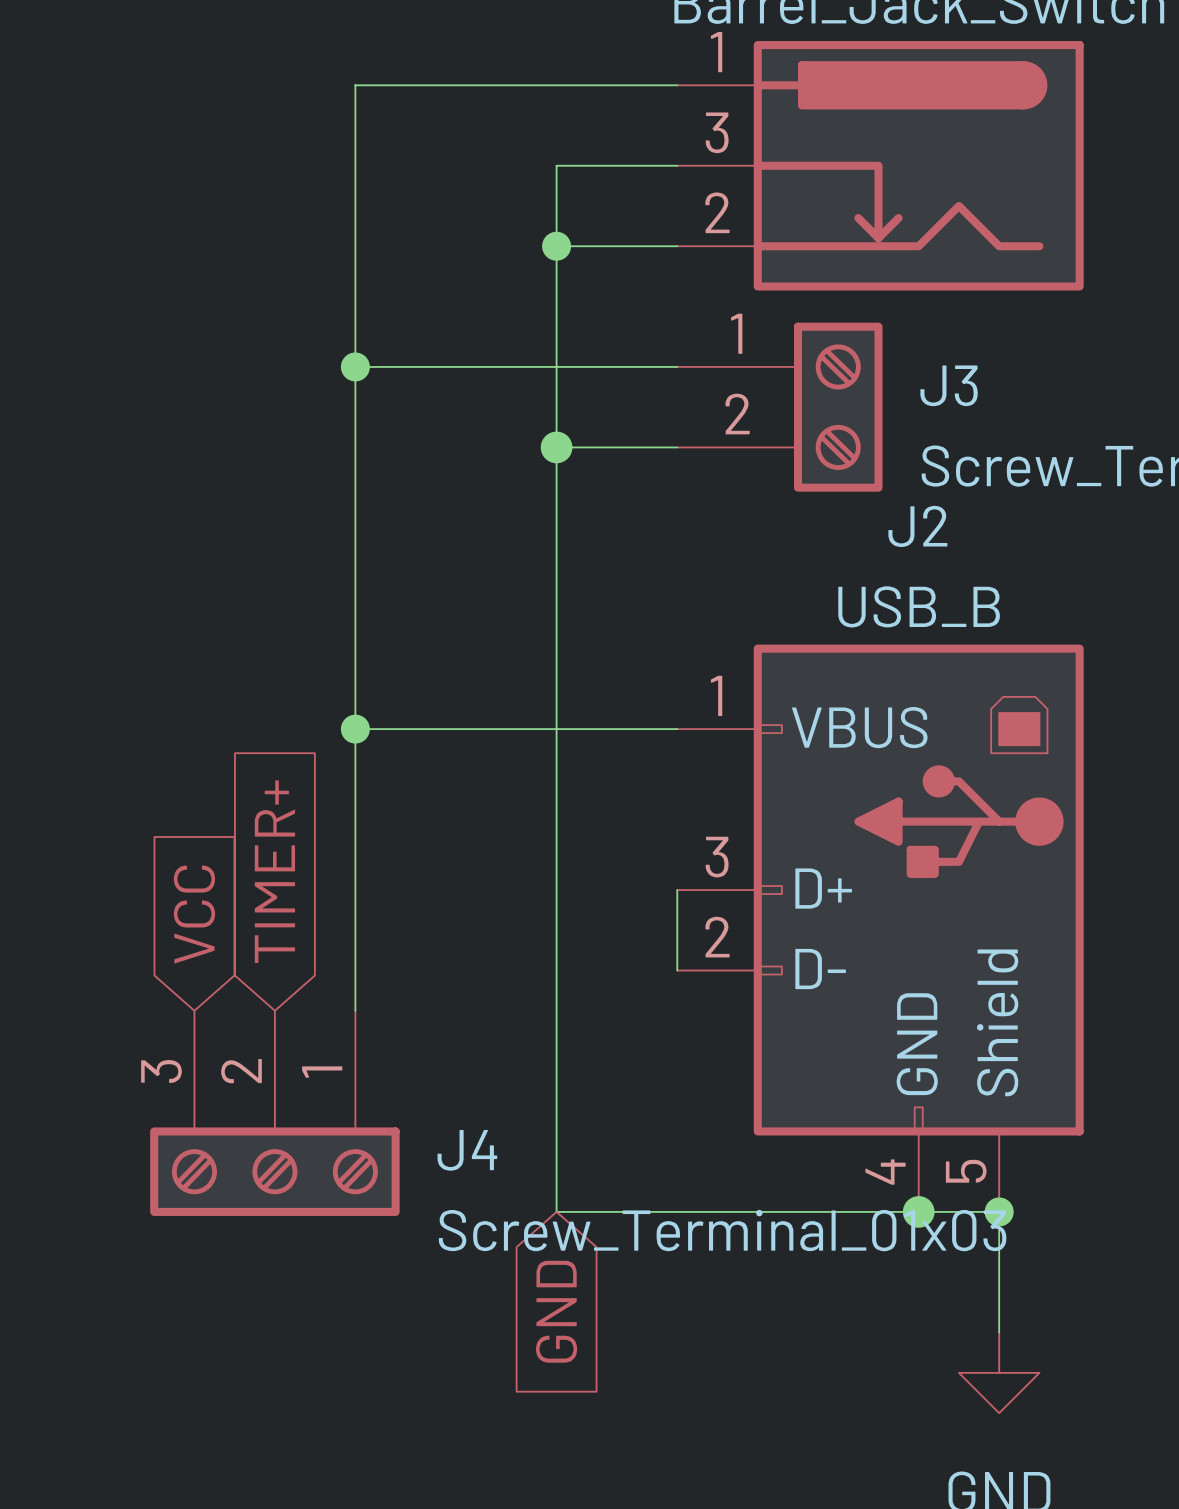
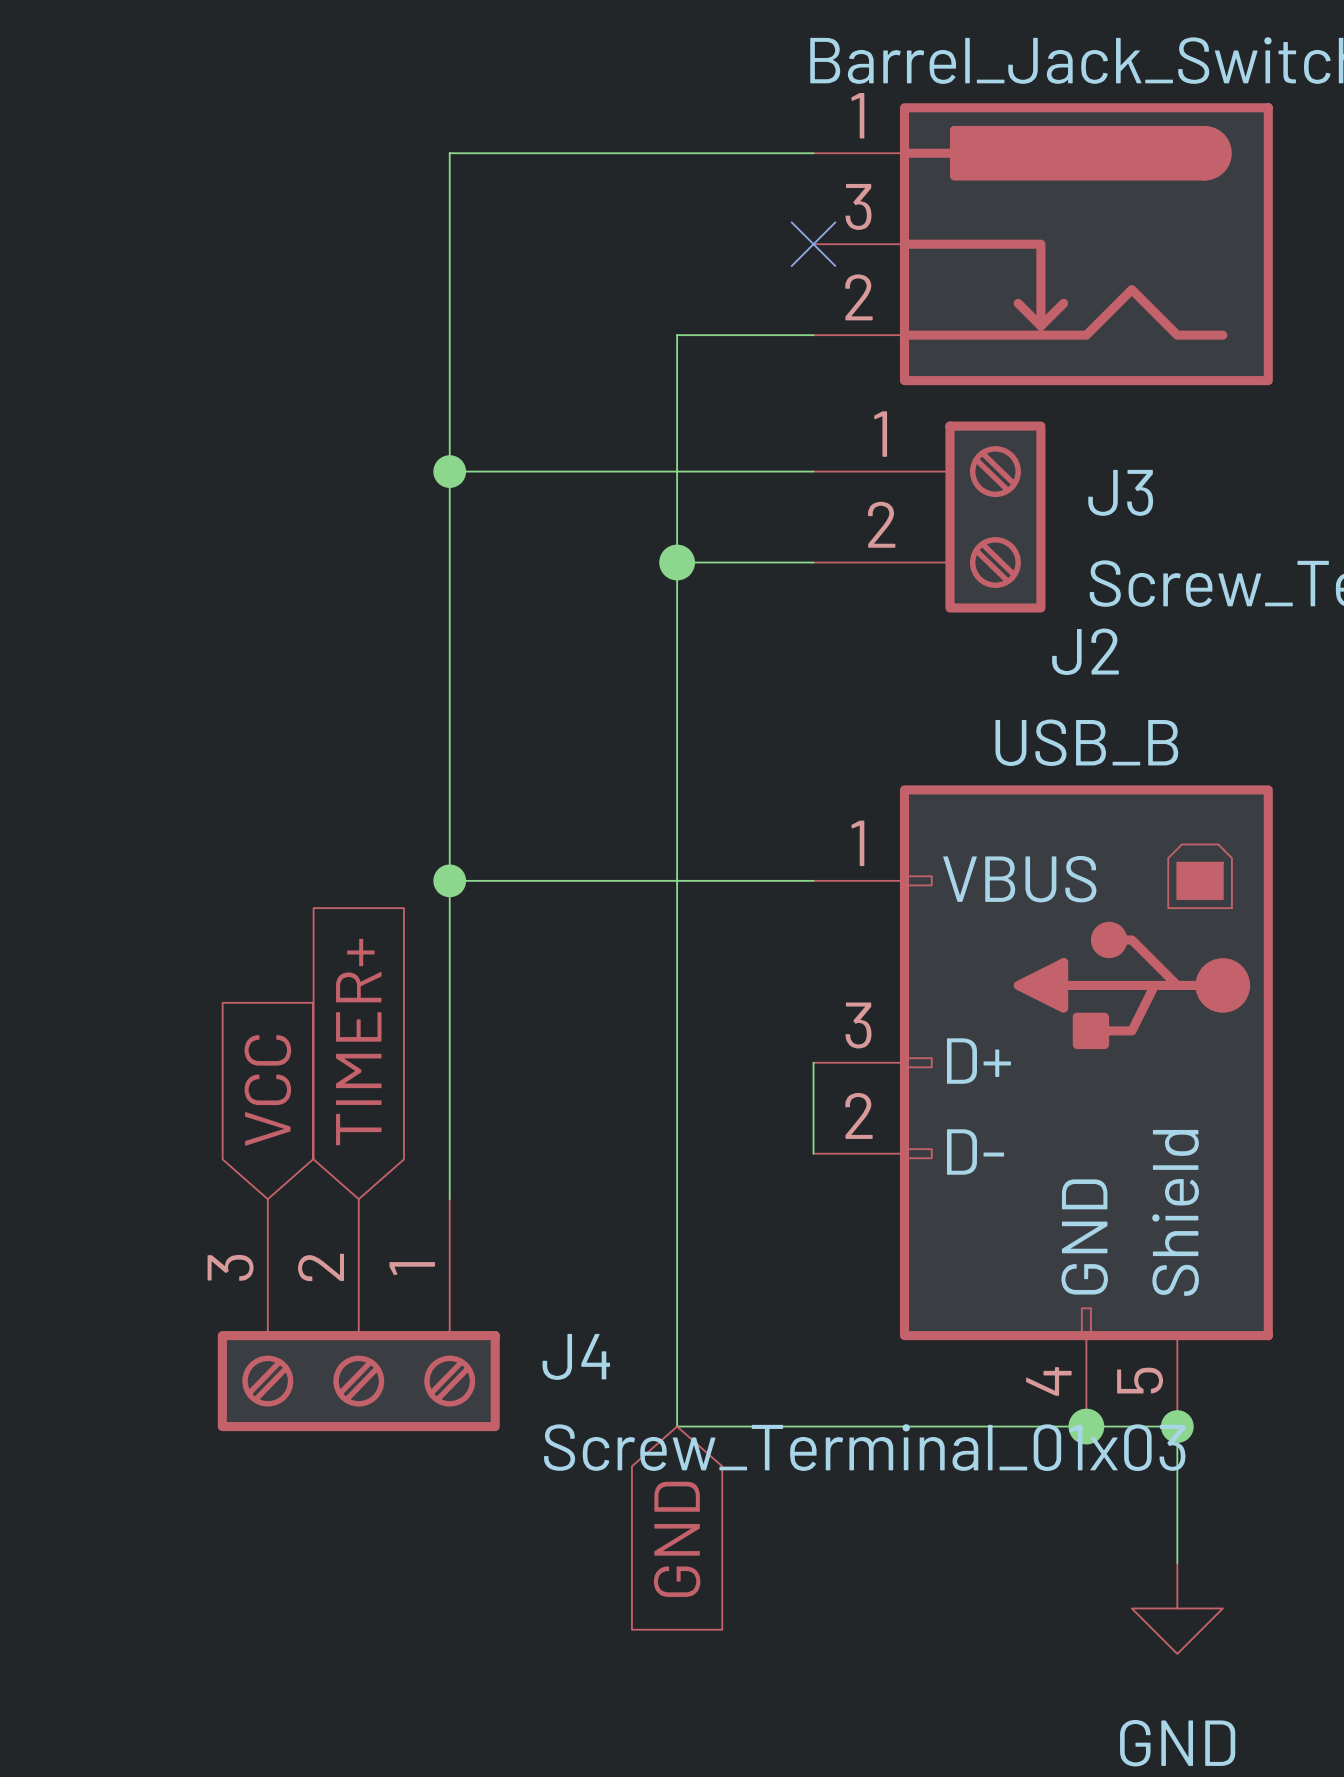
wire: (677, 165) (556, 165) (556, 246) -> none
no-connect mark: none -> (813, 244)
junction: (556, 246) -> none

